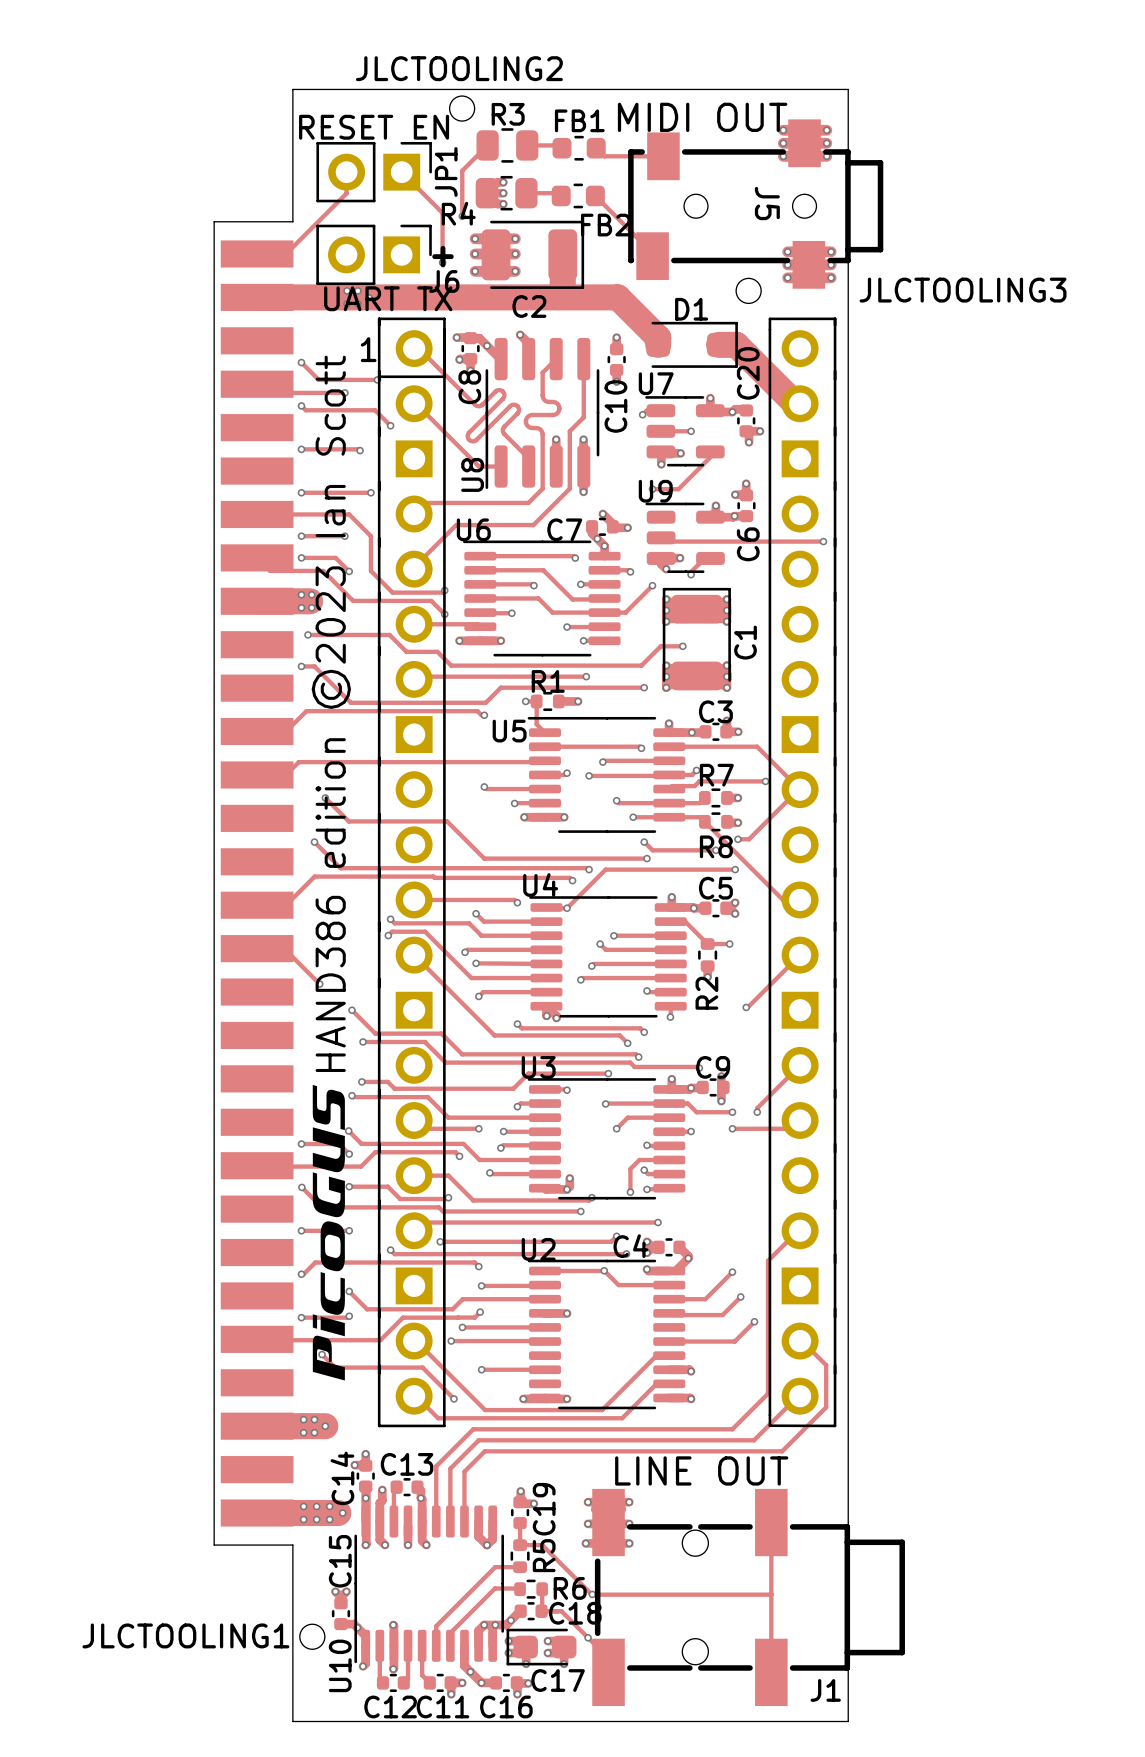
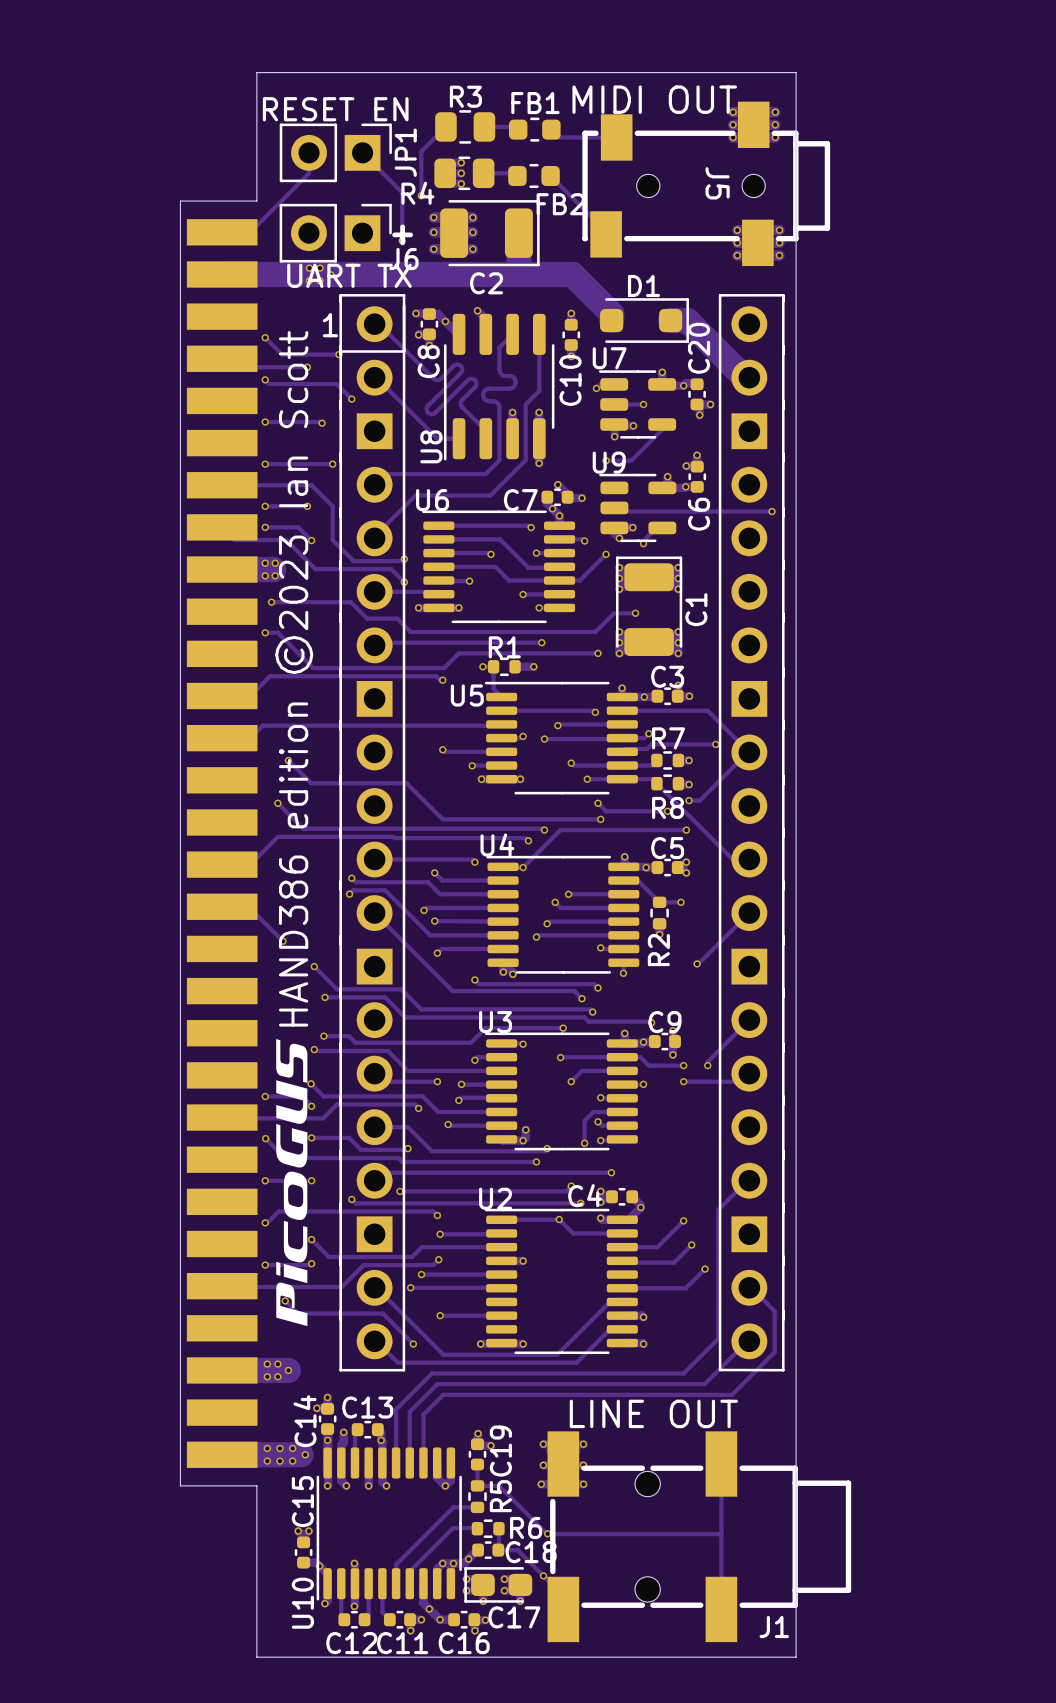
JLCTOOLING2: (462, 108) -> none
JLCTOOLING3: (748, 290) -> none
JLCTOOLING1: (312, 1636) -> none

